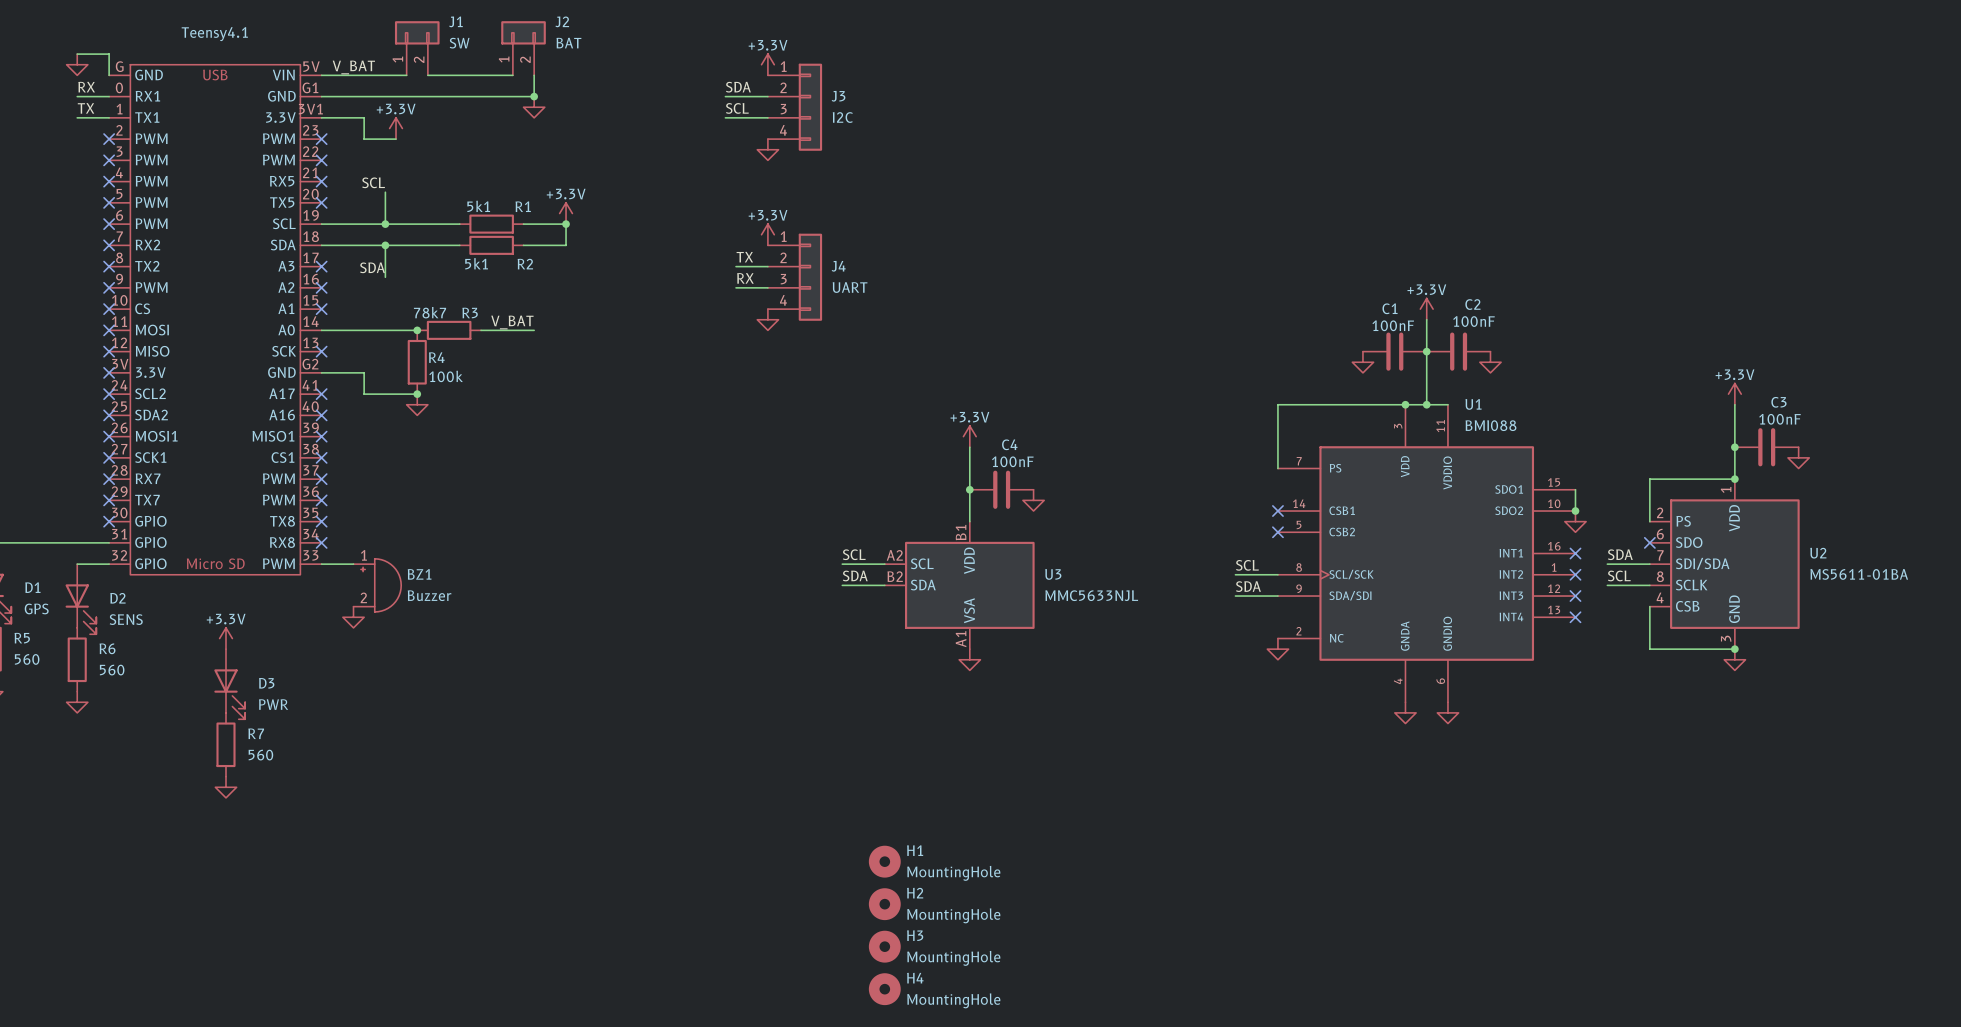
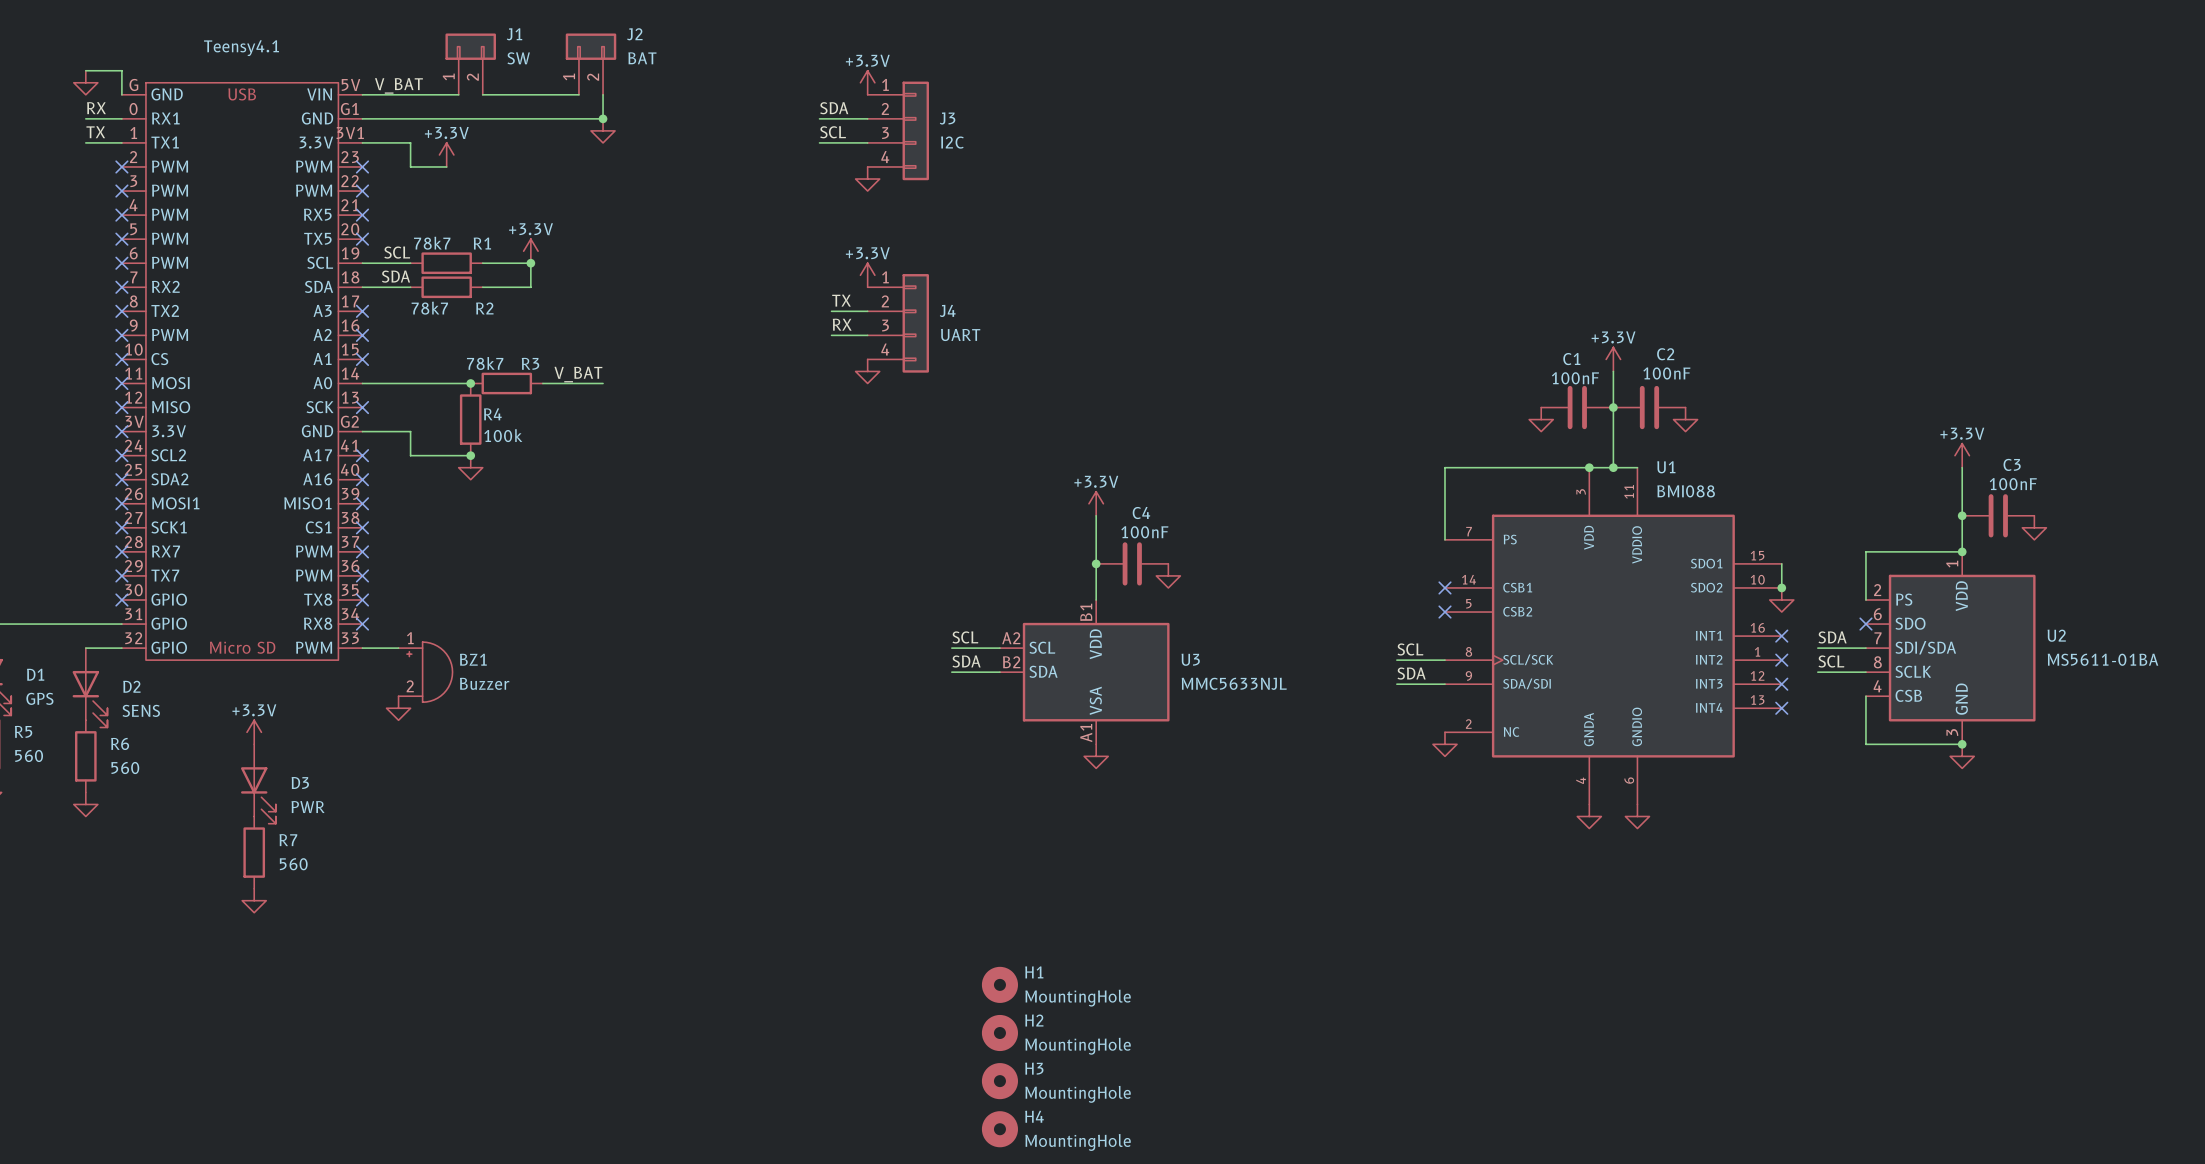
label position: SCL (373, 182) -> SCL (397, 252)
wire: (385, 192) (385, 224) -> none
R1 value: 5k1 (478, 206) -> 78k7 (432, 243)
power symbol position: +3.3V (566, 213) -> +3.3V (530, 251)
wire: (364, 224) (427, 224) -> none
junction: (385, 224) -> none
junction: none -> (530, 263)
R1 position: (491, 224) -> (446, 263)
wire: (523, 224) (566, 224) (566, 245) (523, 245) -> none
junction: (566, 224) -> none
wire: (364, 245) (427, 245) -> none
wire: (385, 245) (385, 277) -> none
junction: (385, 245) -> none
R2 position: (491, 245) -> (446, 287)
R2 value: 5k1 (476, 263) -> 78k7 (429, 308)
label position: SDA (372, 267) -> SDA (396, 276)

